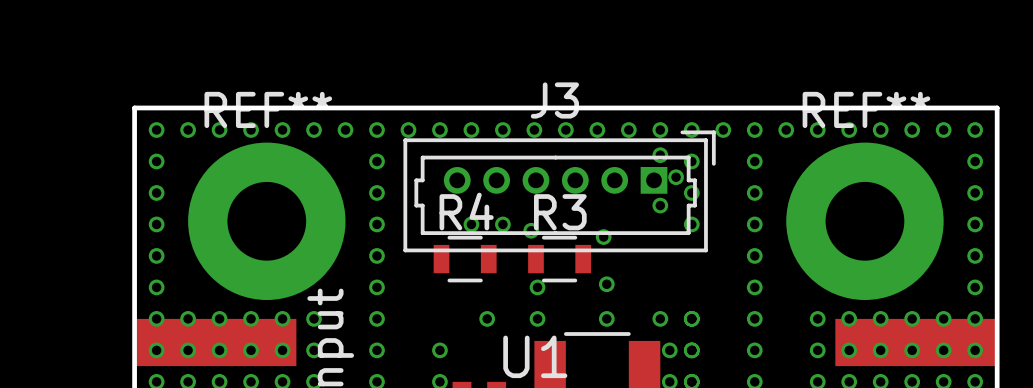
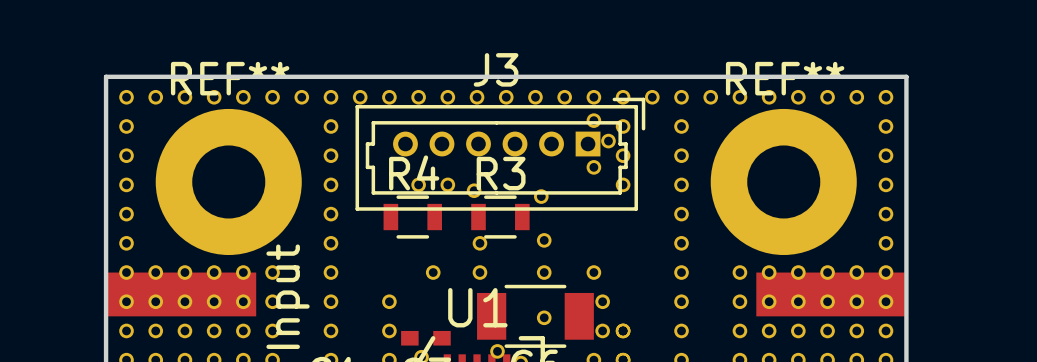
part: (691, 318) -> none
part: (691, 350) -> none
part: none -> (544, 317)

